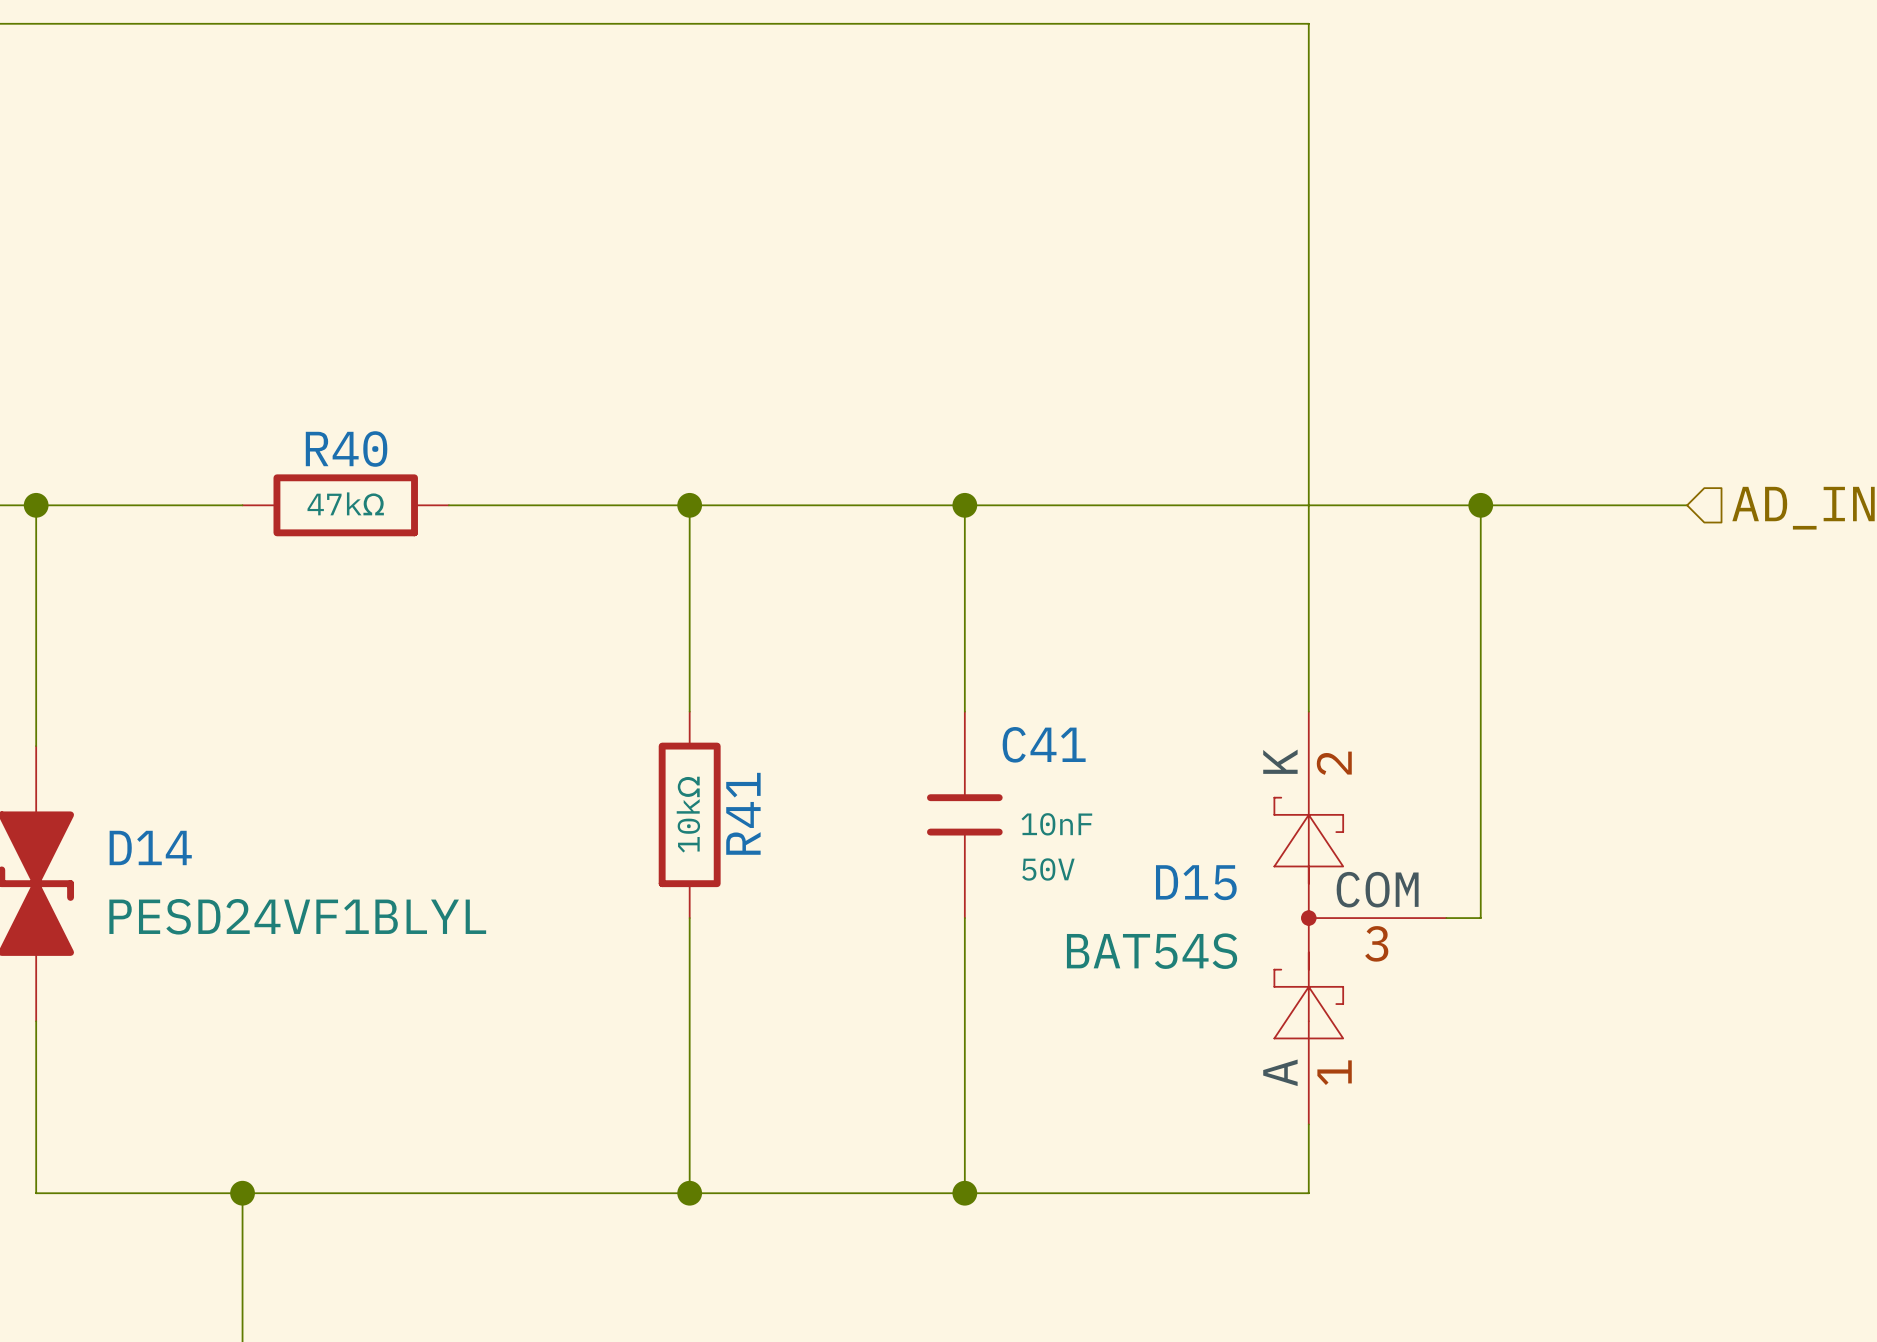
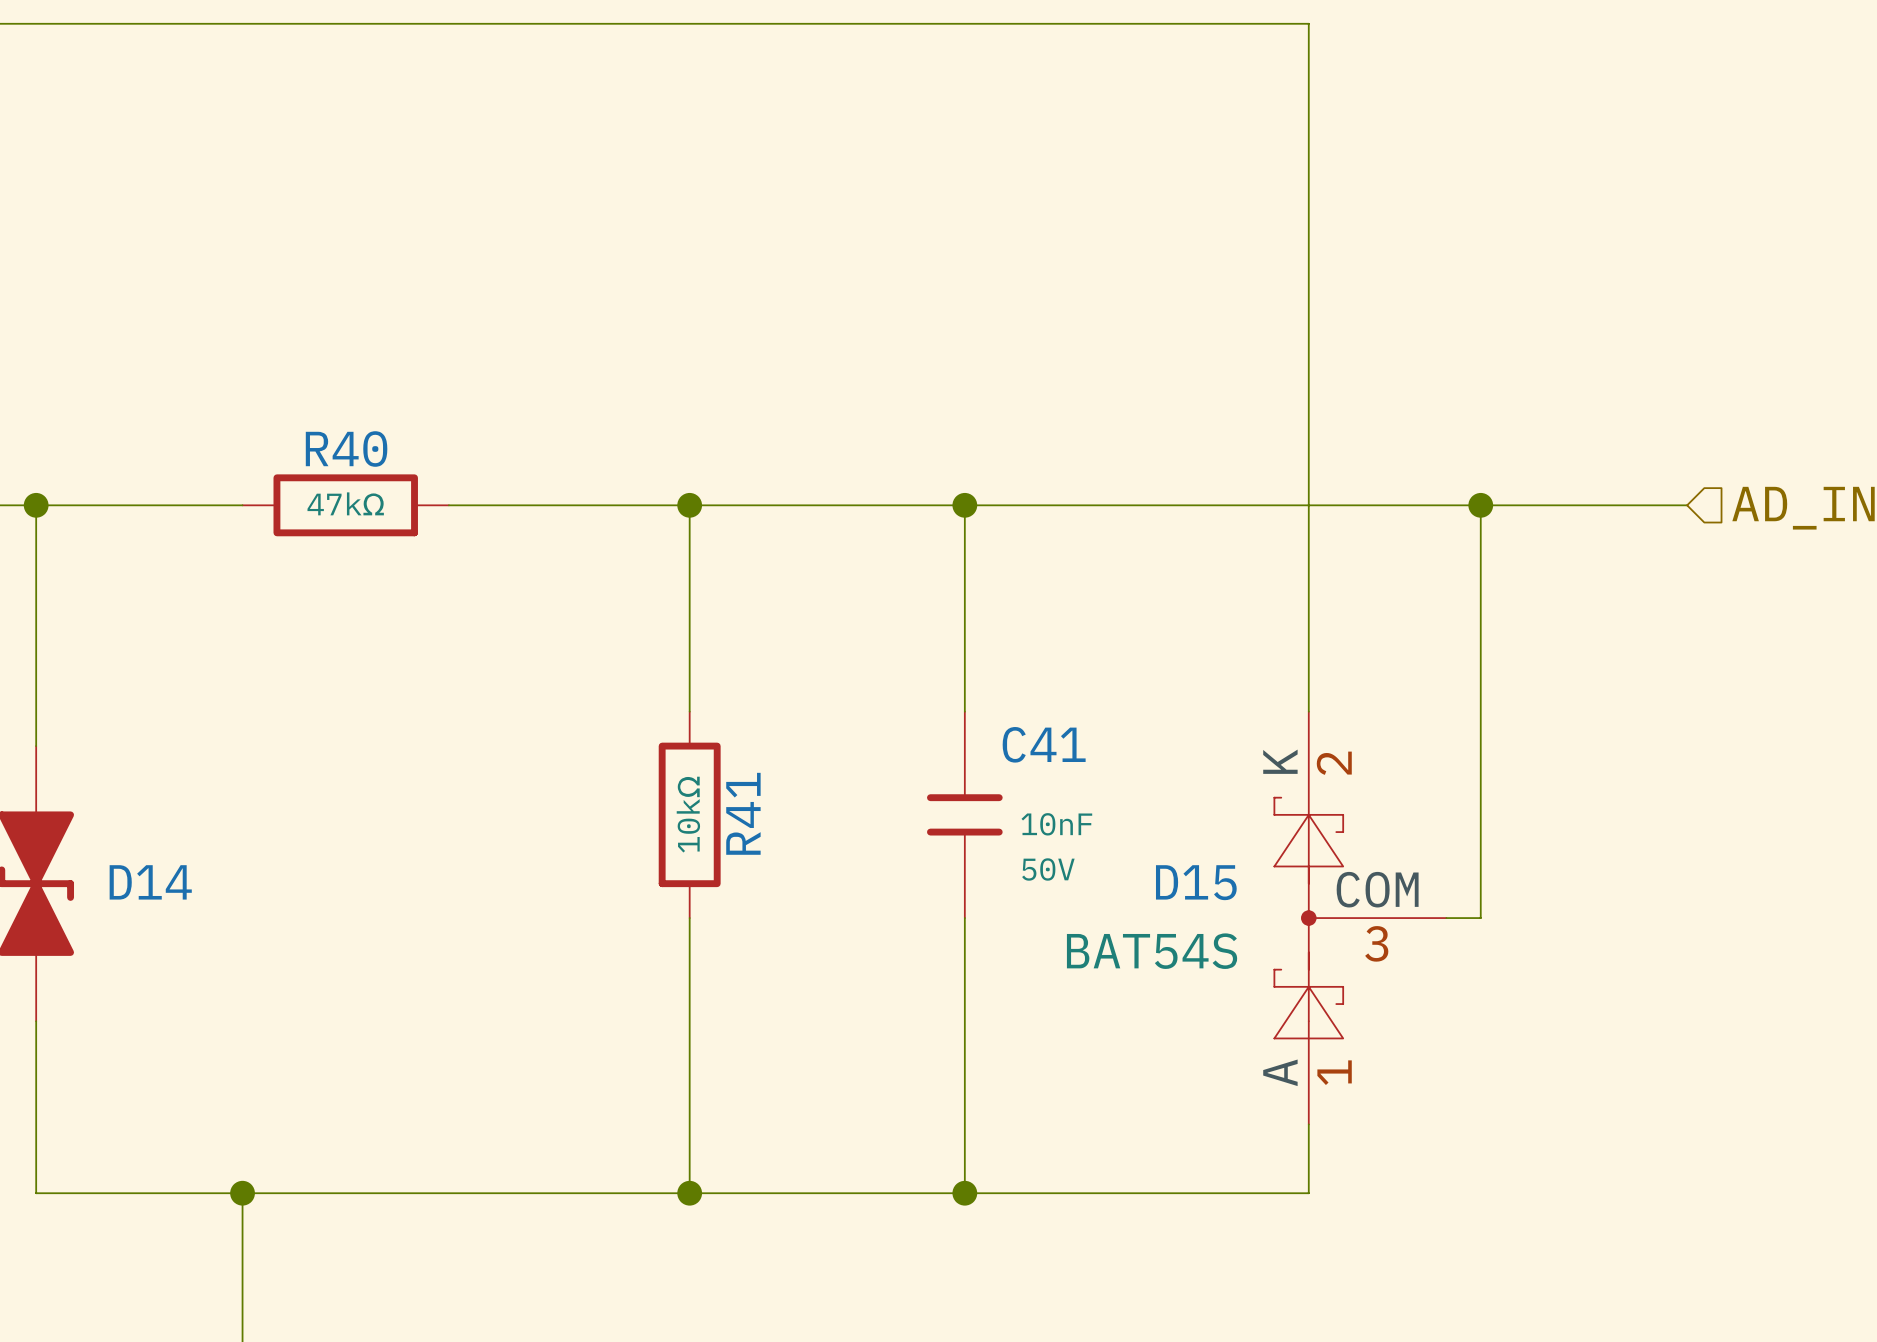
D14 name position: D14 (150, 847) -> D14 (150, 882)
D14 value: PESD24VF1BLYL (297, 916) -> none

